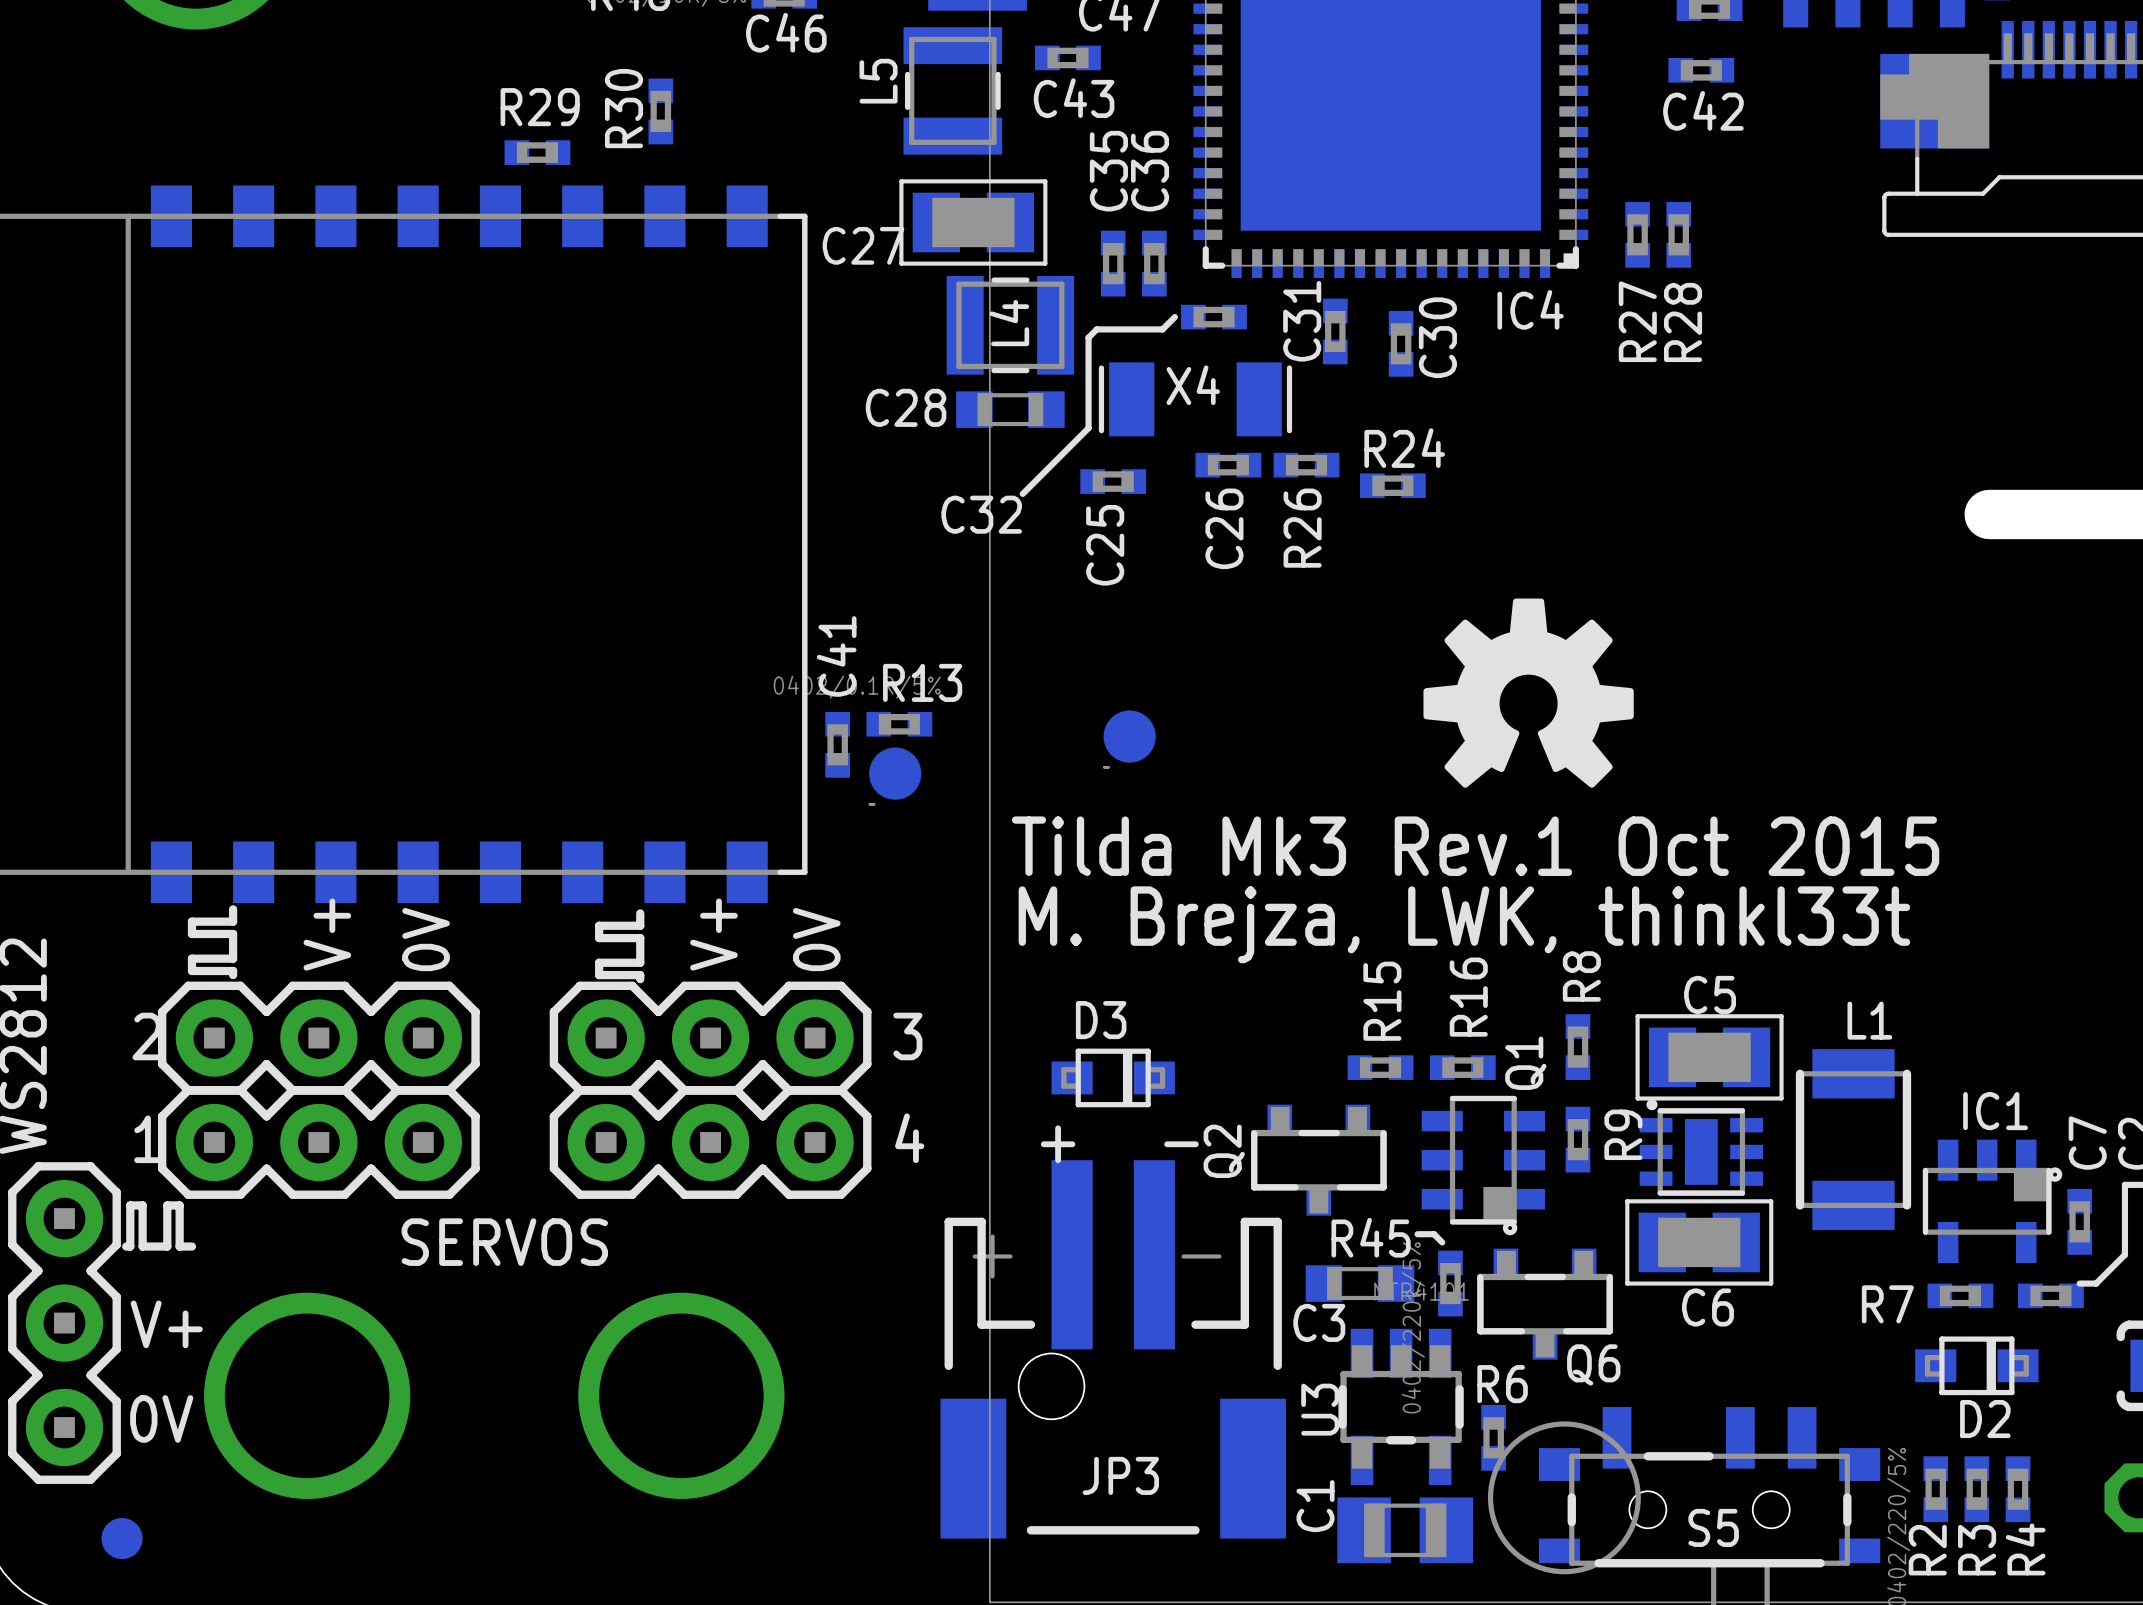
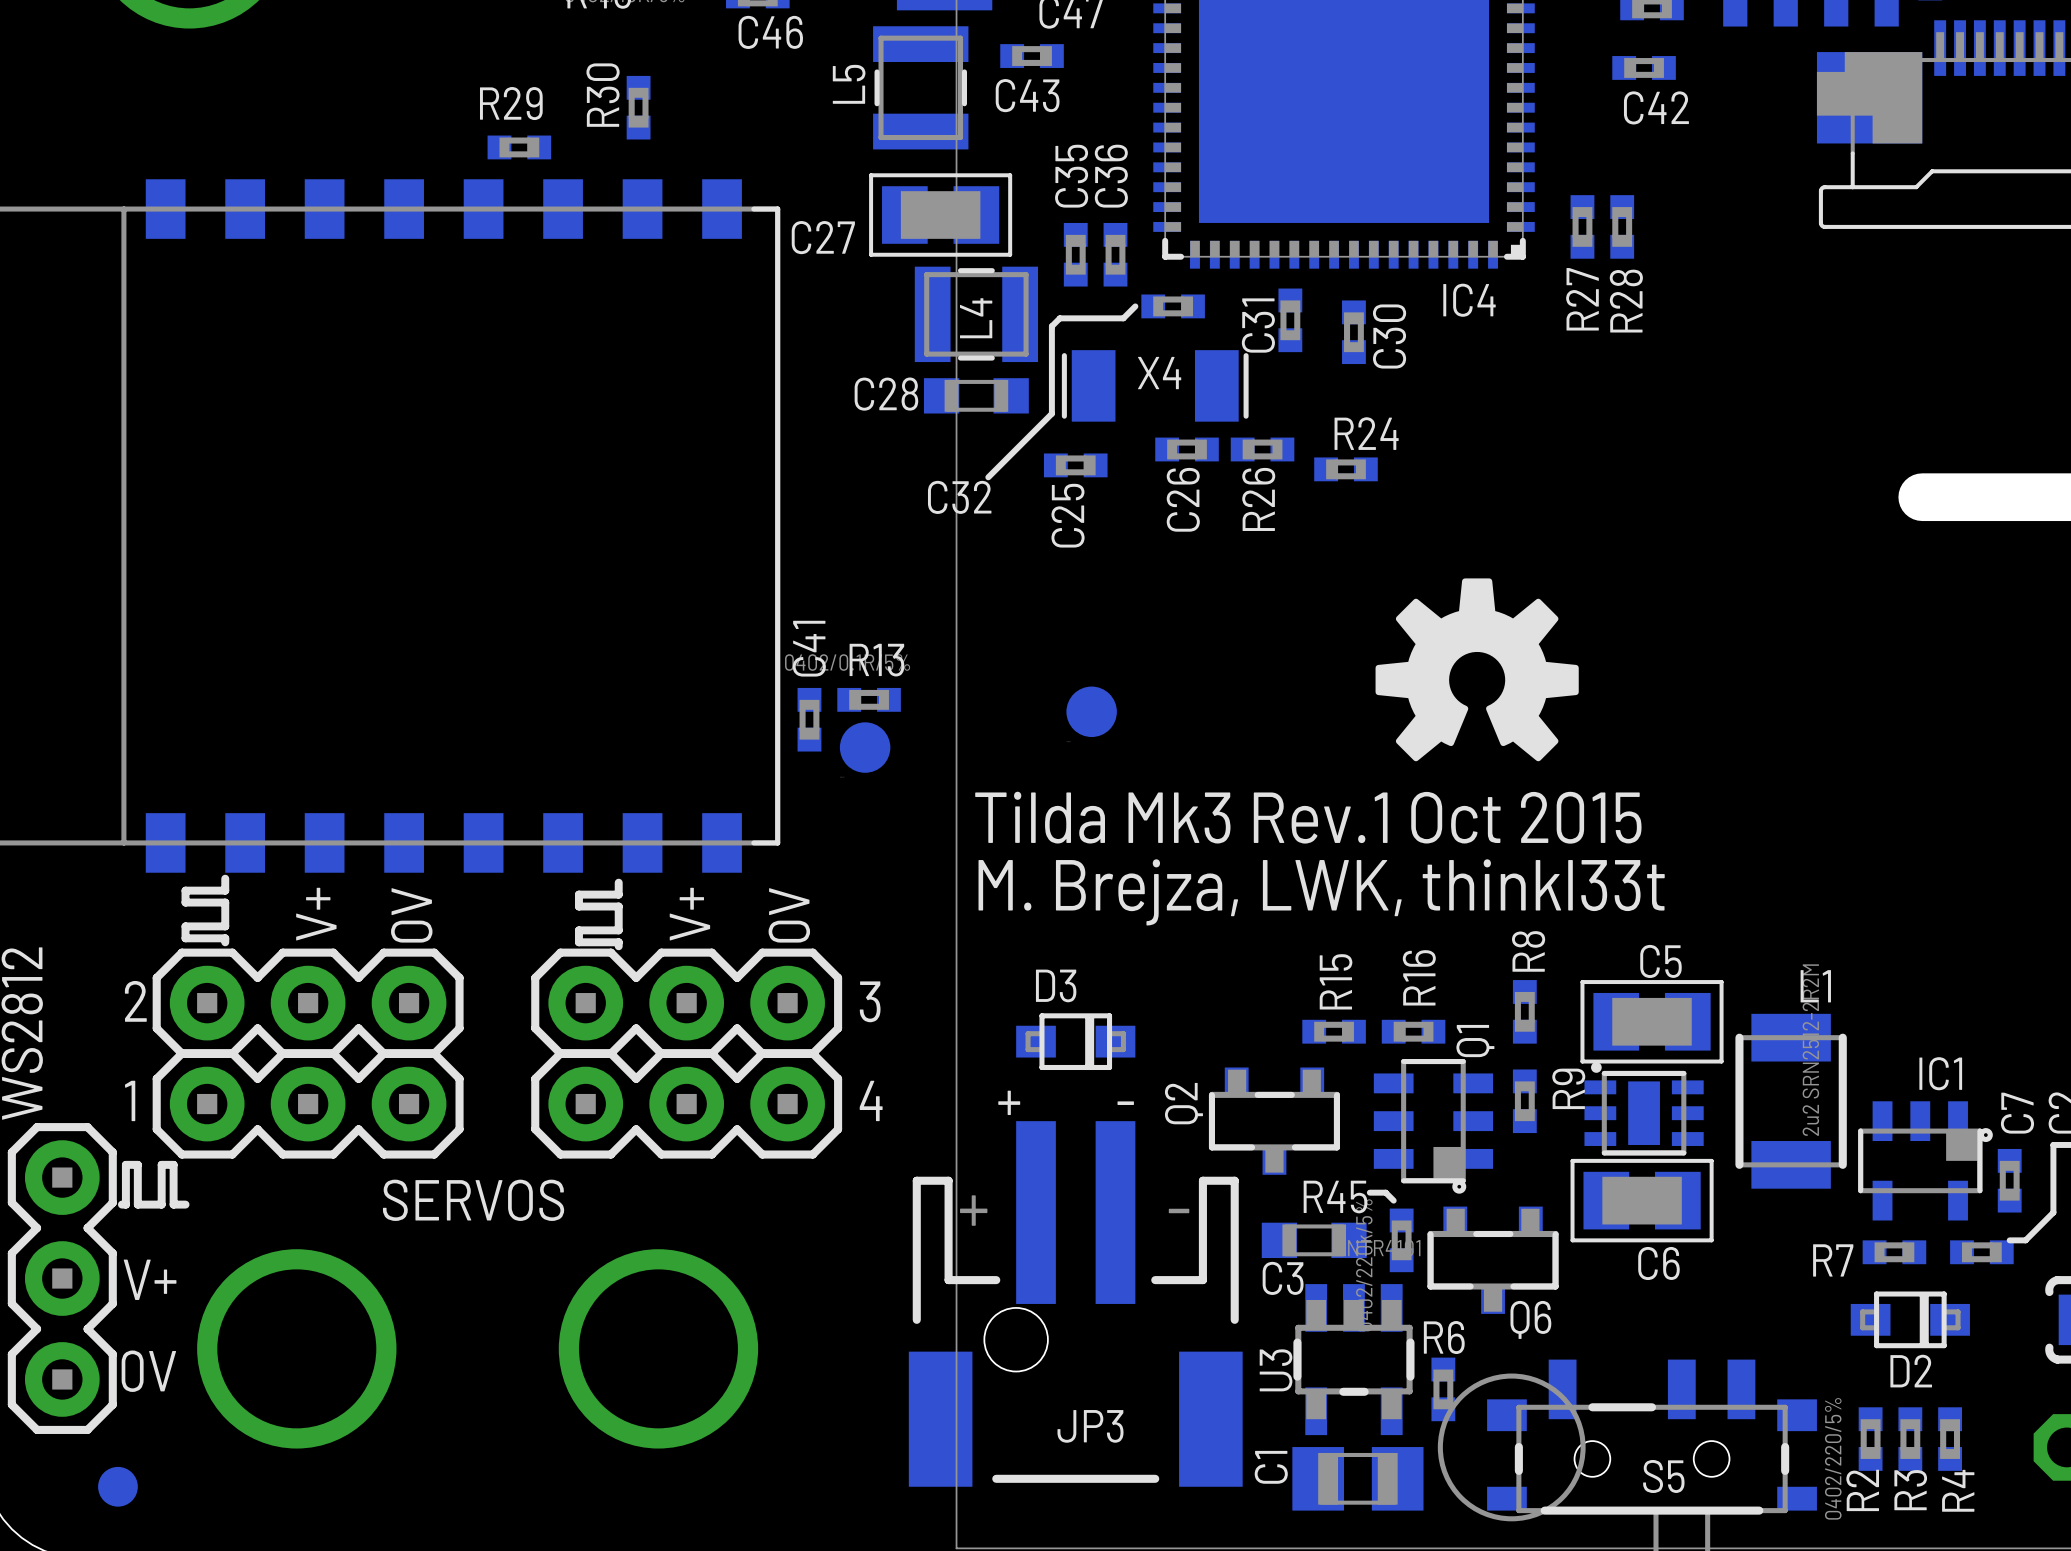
L1 value: none -> 2u2 SRN2512-2R2M (1810, 1050)

